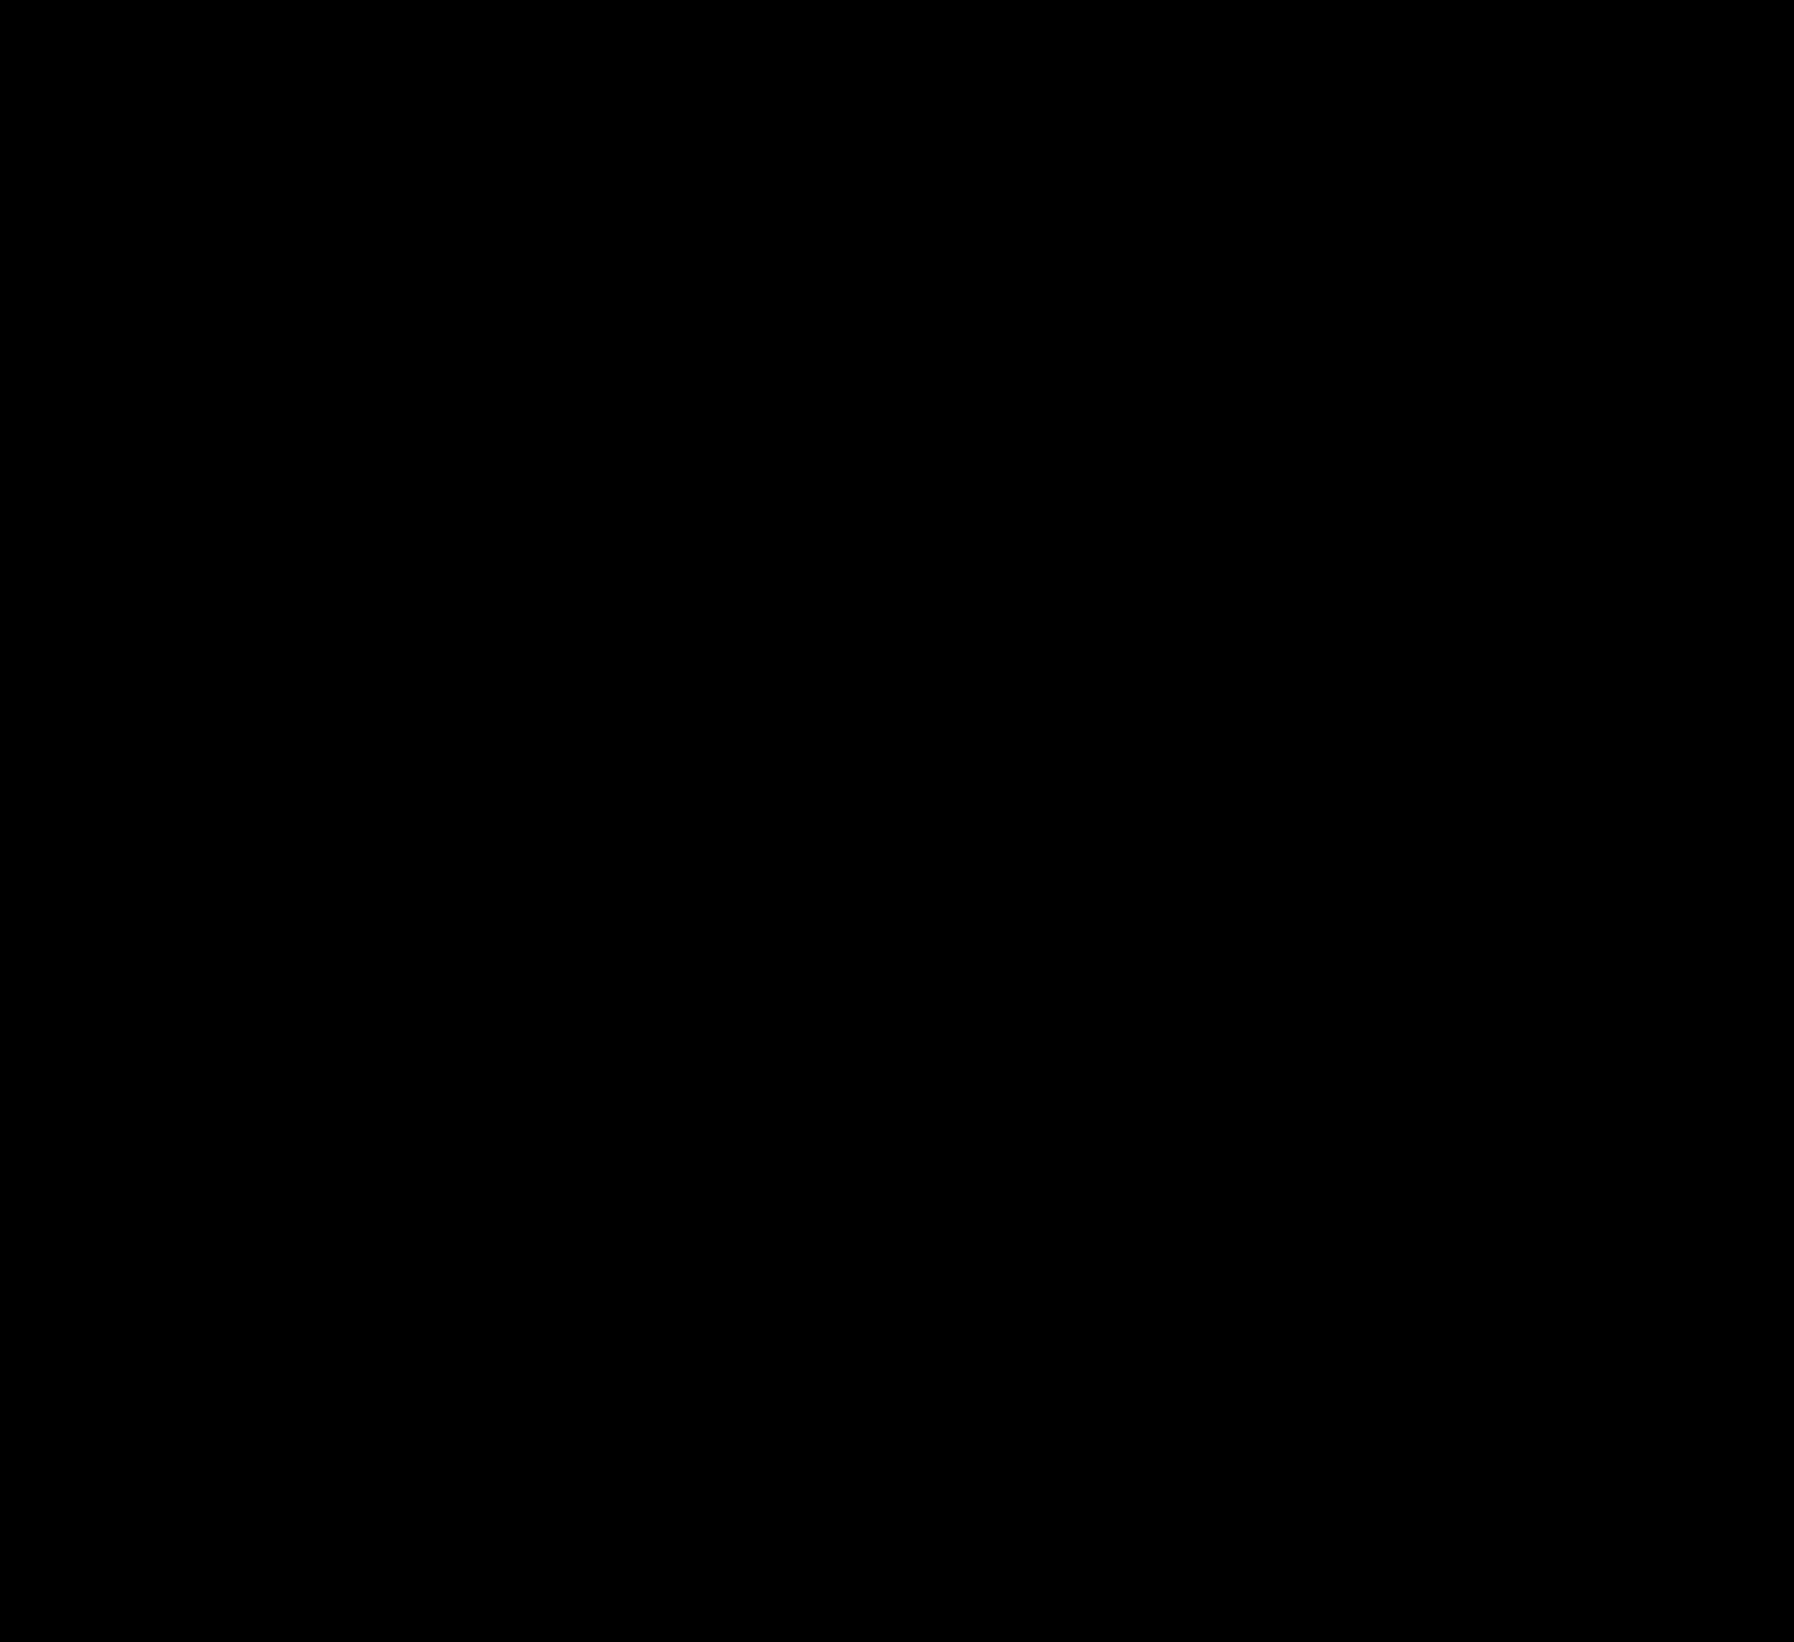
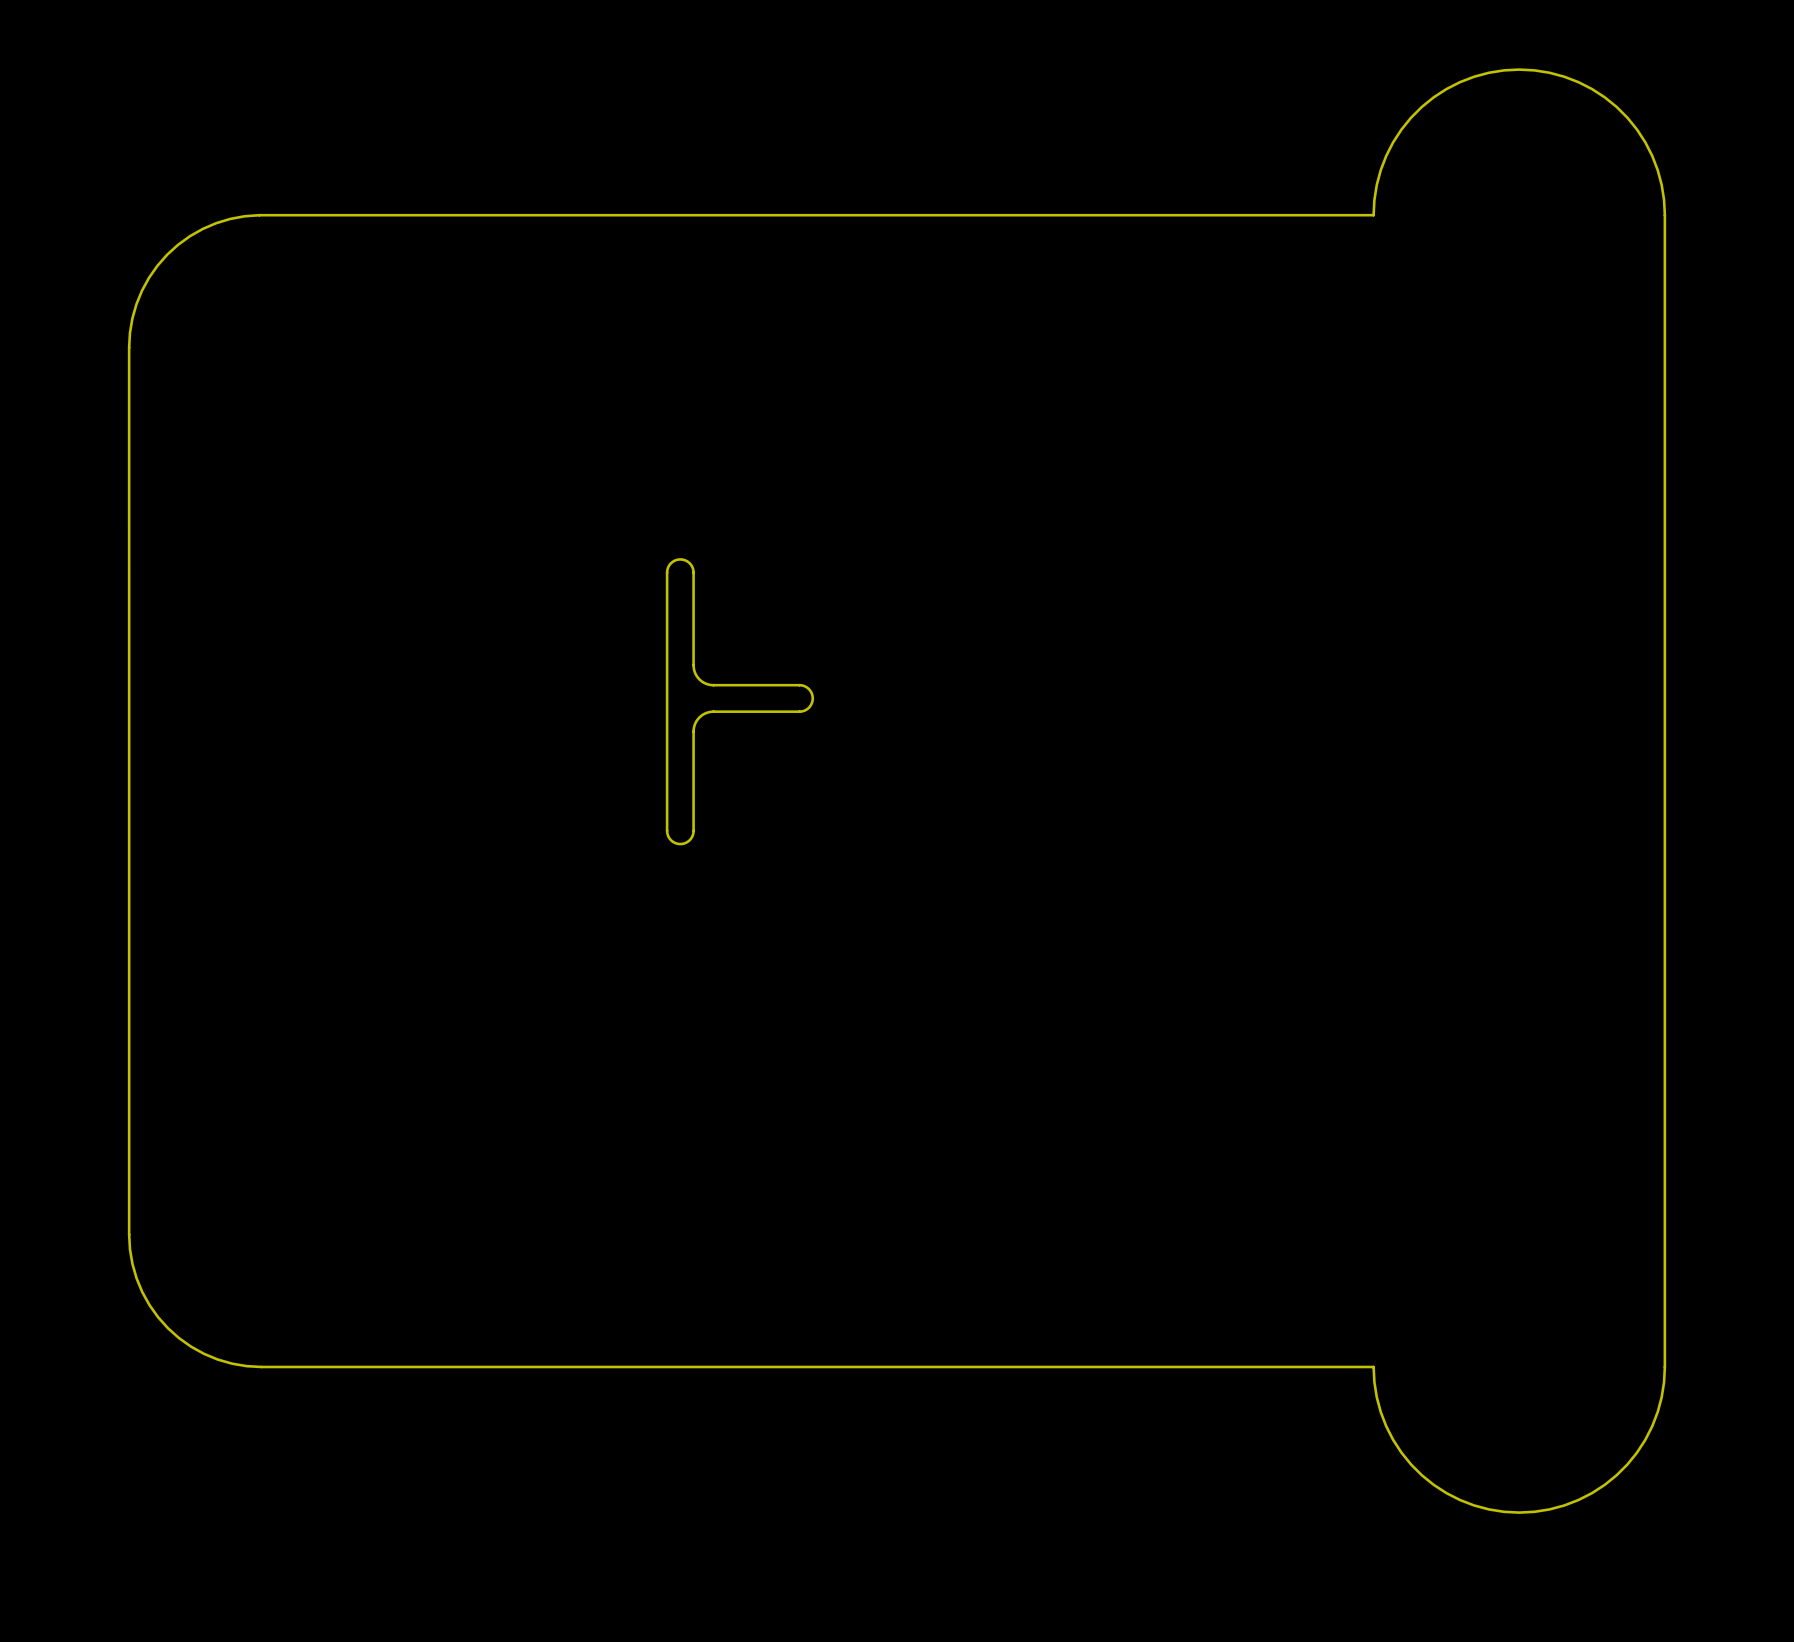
board edge: none -> (1664, 215) (1664, 1366) (1661, 1397) (1652, 1426) (1637, 1452) (1627, 1464) (1604, 1484) (1578, 1500) (1549, 1509) (1534, 1511) (1519, 1512) (1488, 1509) (1460, 1500) (1446, 1493) (1421, 1475) (1411, 1464) (1393, 1439) (1380, 1411) (1376, 1397) (1373, 1366) (261, 1366) (232, 1363) (204, 1353) (179, 1338) (158, 1317) (149, 1305) (136, 1278) (132, 1264) (129, 1234) (129, 347) (132, 318) (141, 290) (157, 265) (178, 244) (202, 228) (216, 223) (244, 216) (259, 215) (1373, 215) (1374, 199) (1380, 170) (1393, 142) (1411, 117) (1433, 97) (1460, 82) (1488, 72) (1519, 69) (1549, 72) (1578, 82) (1604, 97) (1627, 117) (1645, 142) (1657, 170) (1664, 199) (1664, 215)
board edge: none -> (693, 572) (693, 665) (695, 672) (699, 679) (705, 683) (713, 685) (801, 685) (809, 689) (812, 698) (809, 707) (801, 711) (713, 711) (705, 713) (699, 717) (695, 723) (693, 731) (693, 832) (689, 840) (680, 844) (671, 840) (667, 830) (667, 572) (670, 563) (680, 559) (689, 563) (693, 572)

